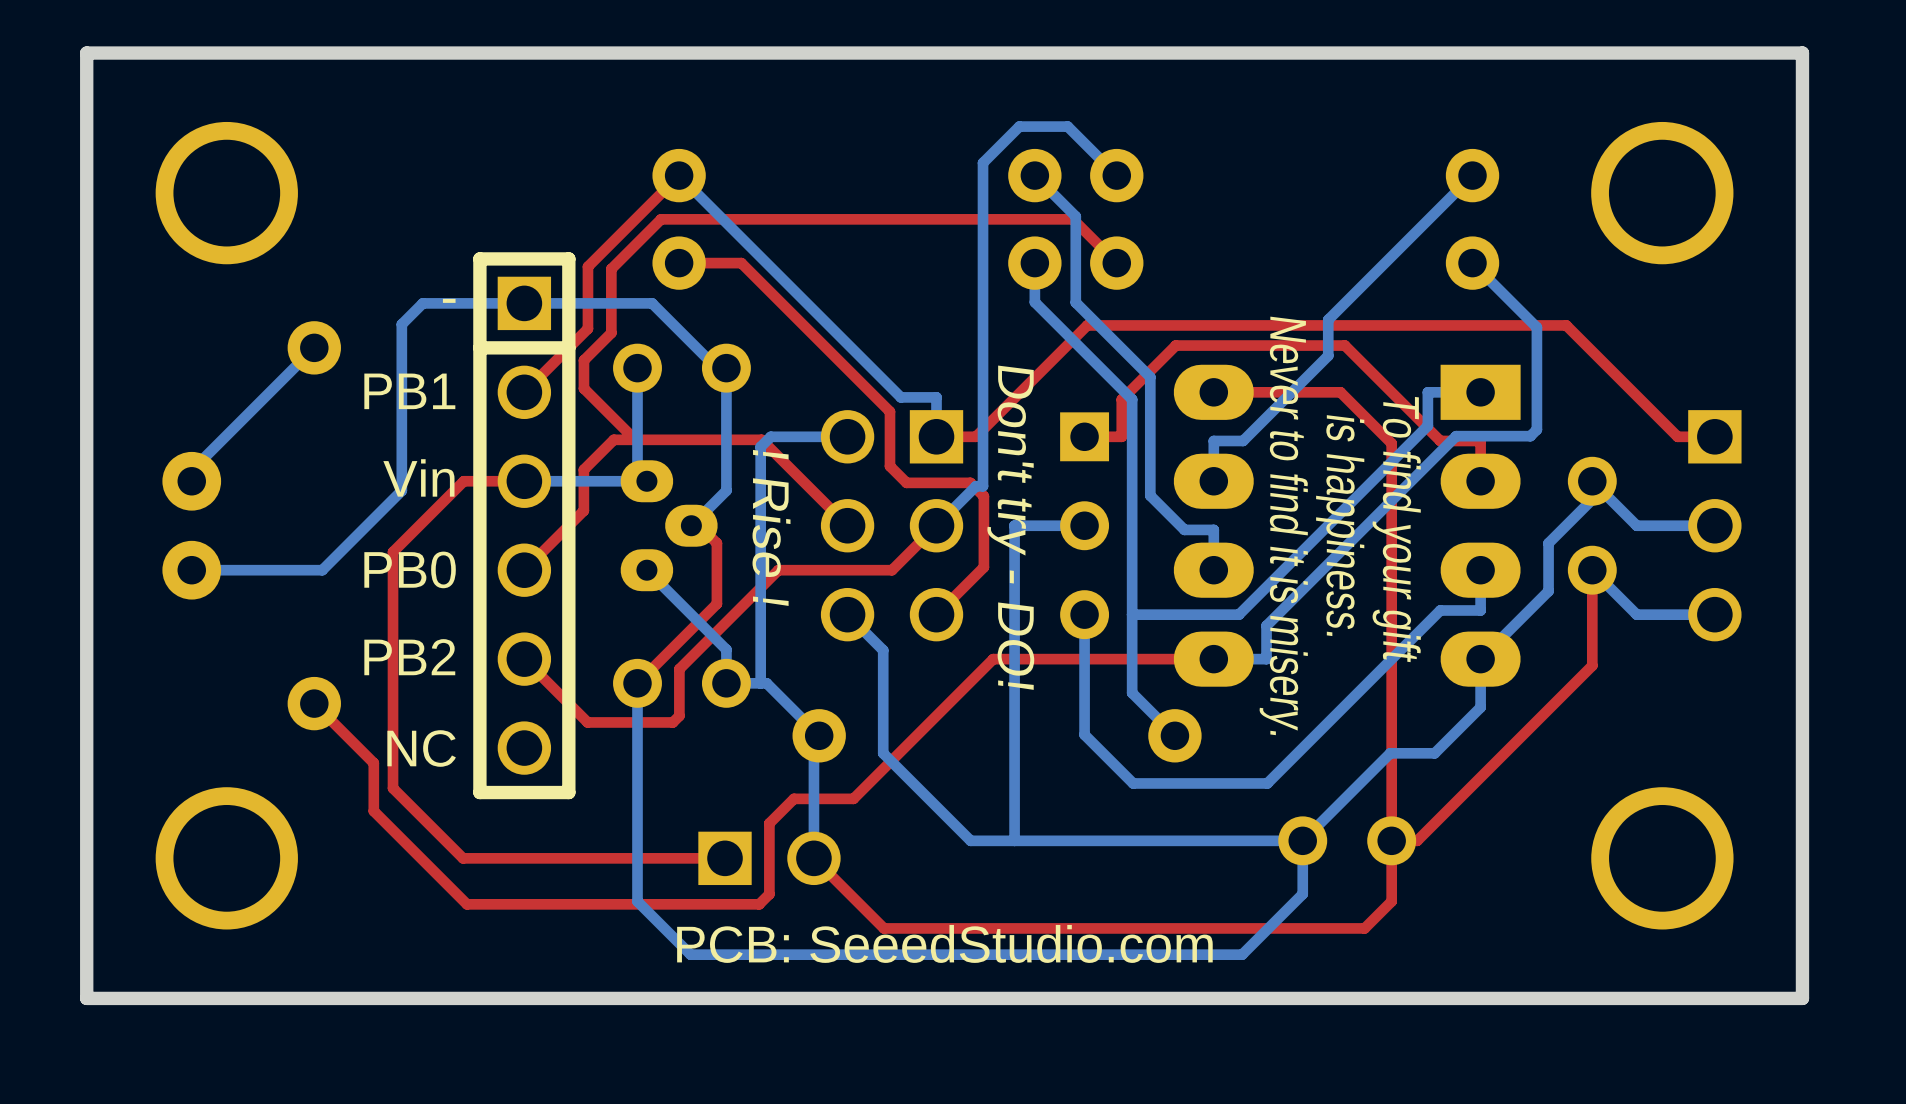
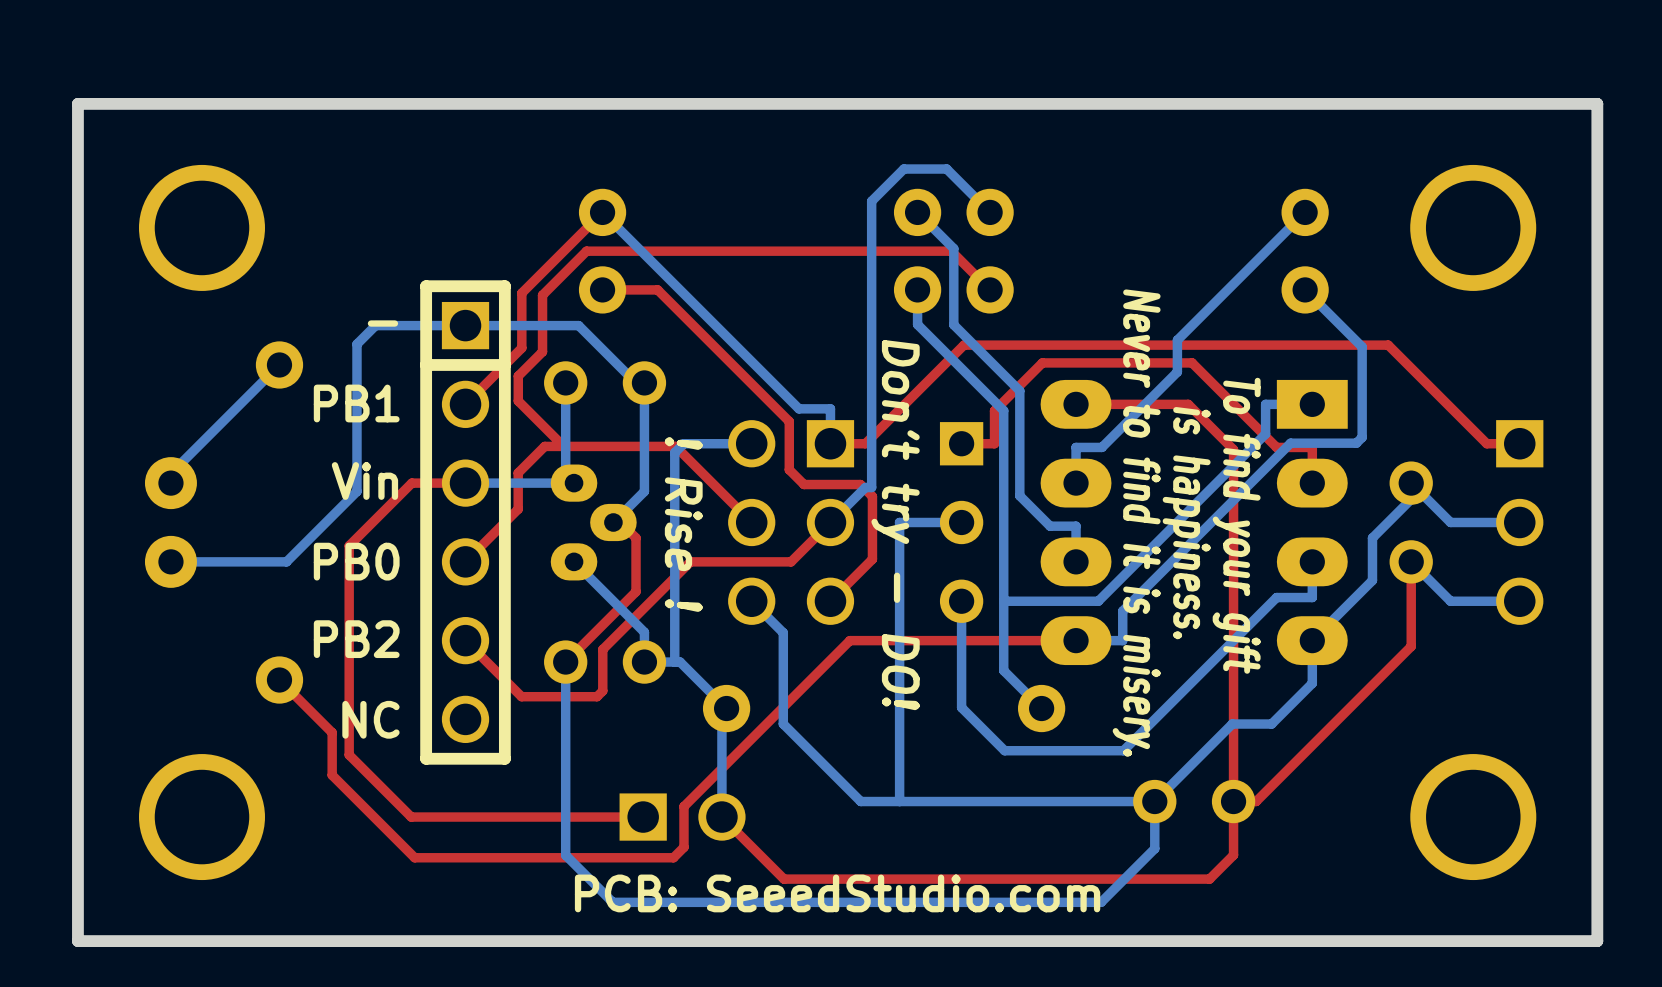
top track: (993, 659) (853, 798) (793, 798) (769, 823) (769, 894) -> (880, 640) (849, 640) (683, 806) (682, 848)

